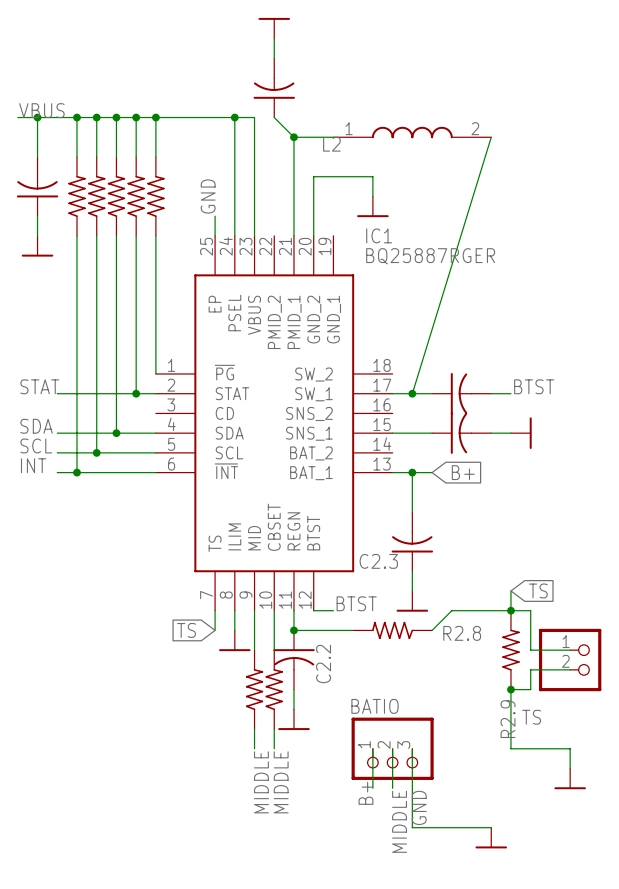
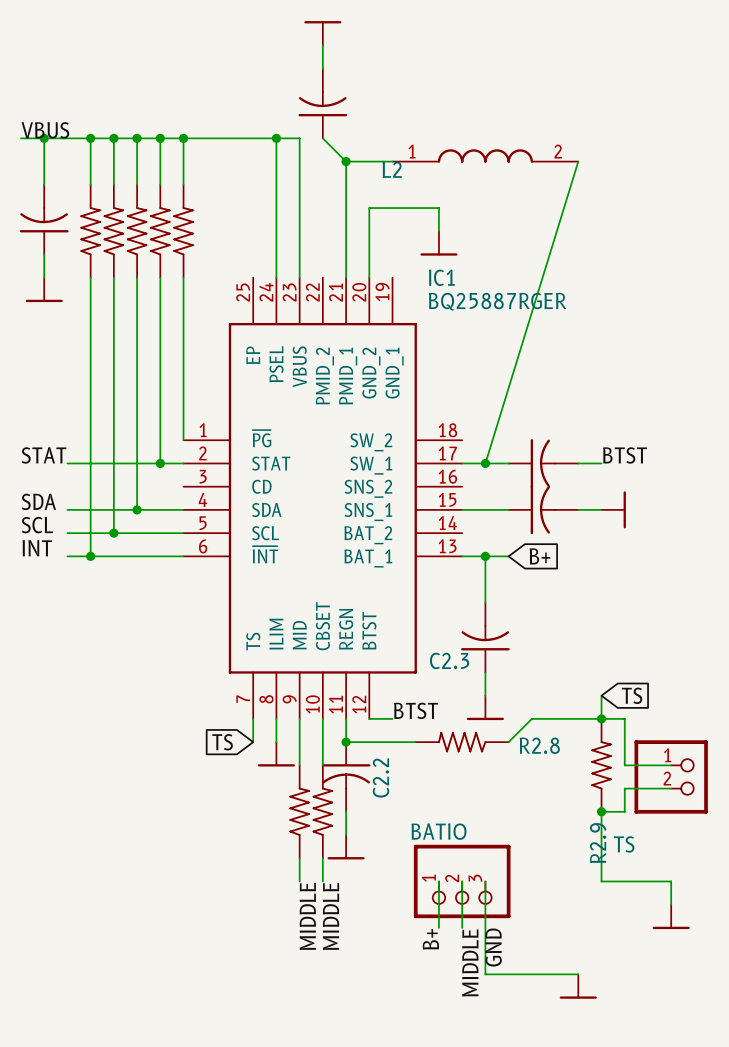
label: GND (208, 196) -> none
wire: (215, 216) (215, 235) -> none

